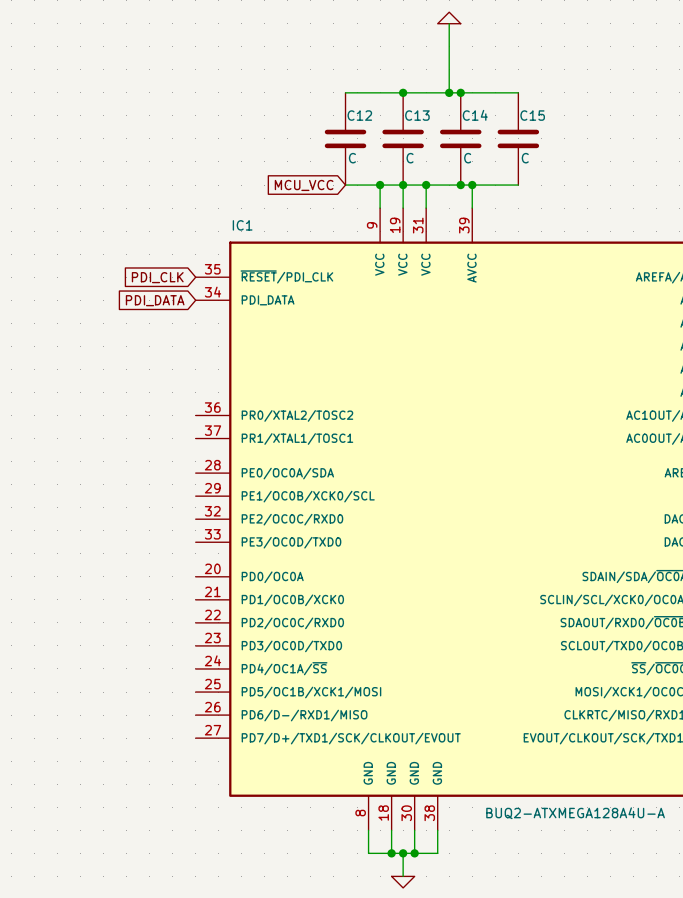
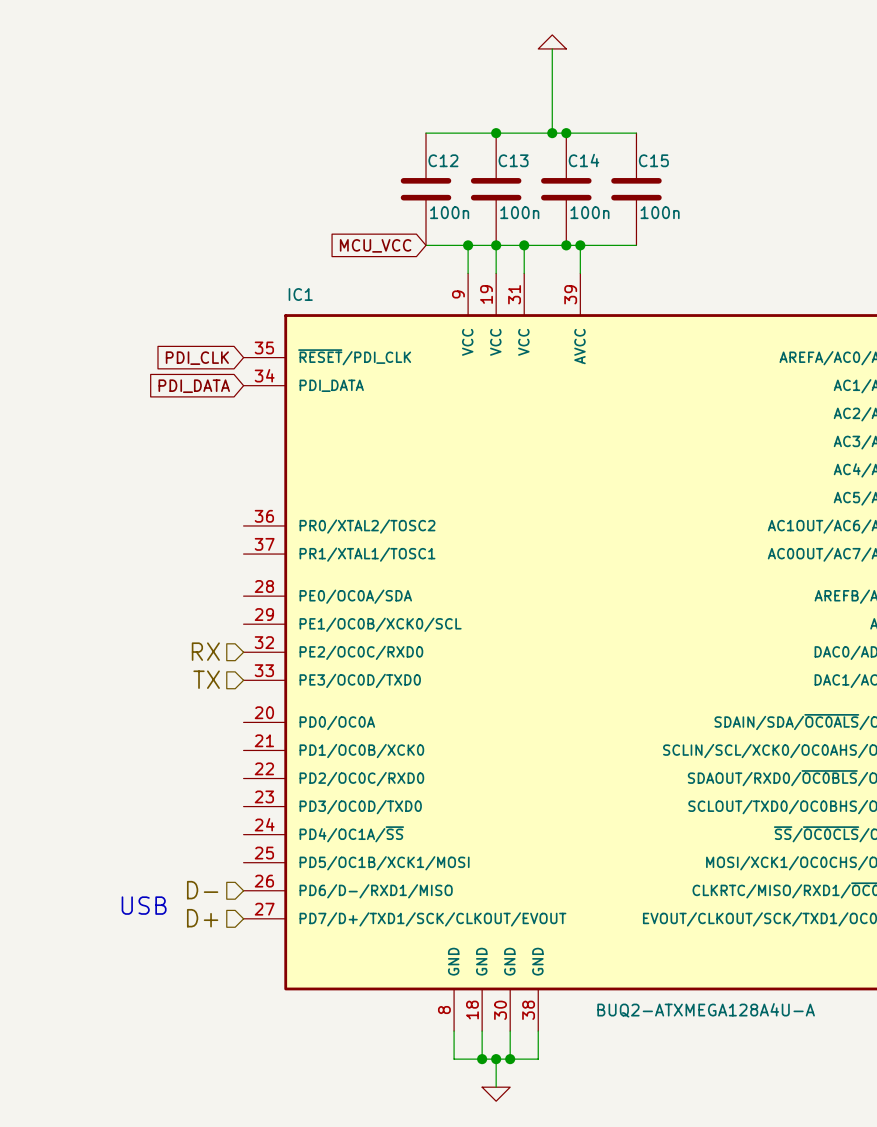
C12 value: C (352, 158) -> 100n (449, 212)
C13 value: C (410, 158) -> 100n (519, 212)
C14 value: C (467, 158) -> 100n (589, 212)
C15 value: C (525, 158) -> 100n (660, 212)
hierarchical label: none -> RX (205, 651)
hierarchical label: none -> TX (206, 679)
hierarchical label: none -> D- (202, 890)
text: none -> USB (144, 905)
hierarchical label: none -> D+ (202, 918)

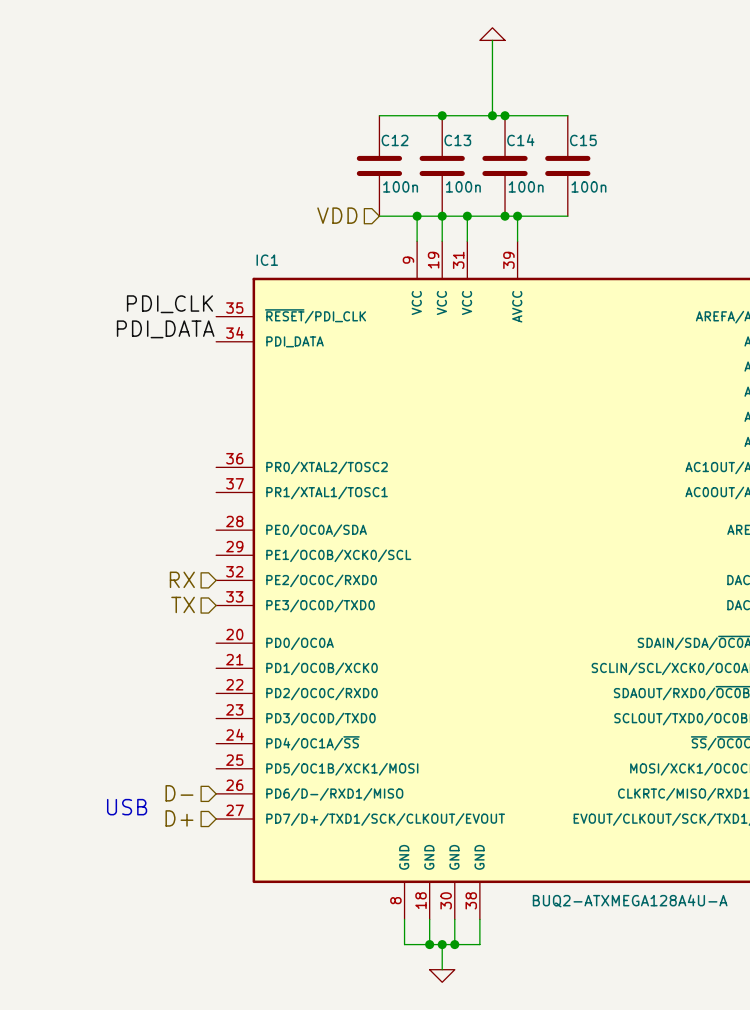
hierarchical label: none -> VDD (337, 215)
global label: MCU_VCC (375, 245) -> none
label: none -> PDI_CLK (169, 304)
global label: PDI_CLK (197, 358) -> none
label: none -> PDI_DATA (165, 329)
global label: PDI_DATA (194, 386) -> none

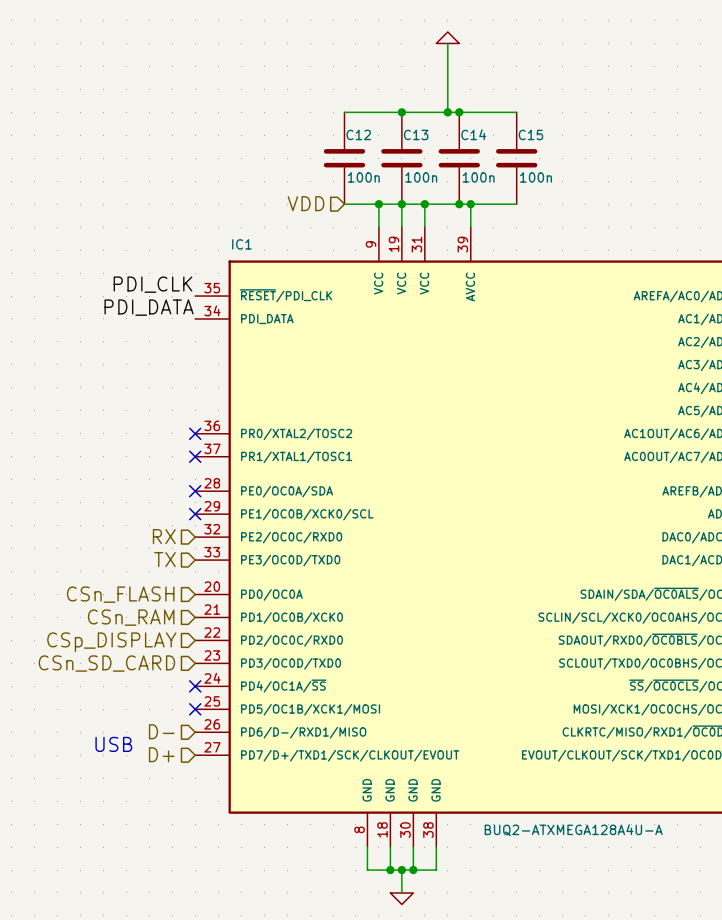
no-connect mark: none -> (195, 433)
no-connect mark: none -> (195, 456)
no-connect mark: none -> (195, 491)
no-connect mark: none -> (195, 514)
hierarchical label: none -> CSn_FLASH (120, 594)
hierarchical label: none -> CSn_RAM (131, 617)
hierarchical label: none -> CSp_DISPLAY (111, 642)
hierarchical label: none -> CSn_SD_CARD (106, 663)
no-connect mark: none -> (195, 686)
no-connect mark: none -> (195, 709)

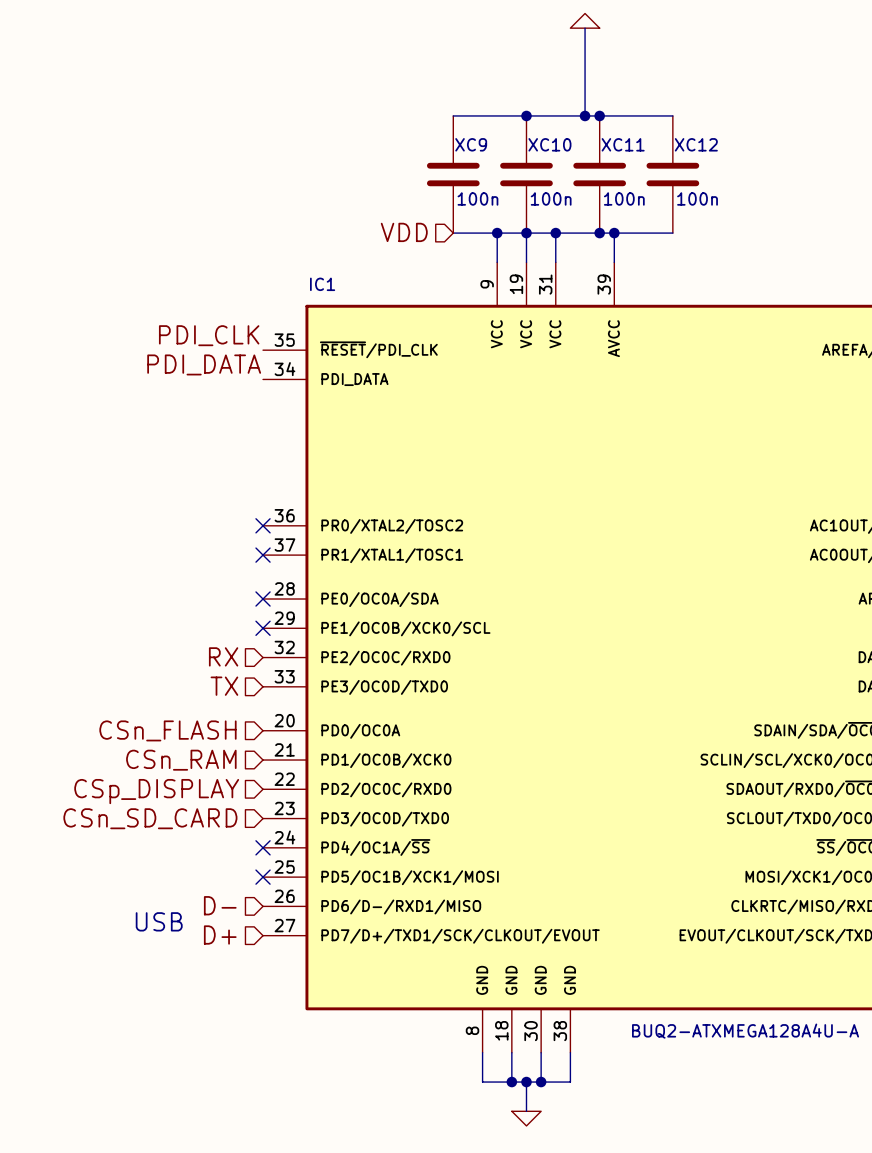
C12 name: C12 (358, 134) -> XC9 (471, 144)
C13 name: C13 (416, 134) -> XC10 (549, 144)
C14 name: C14 (473, 134) -> XC11 (623, 144)
C15 name: C15 (530, 134) -> XC12 (696, 144)

